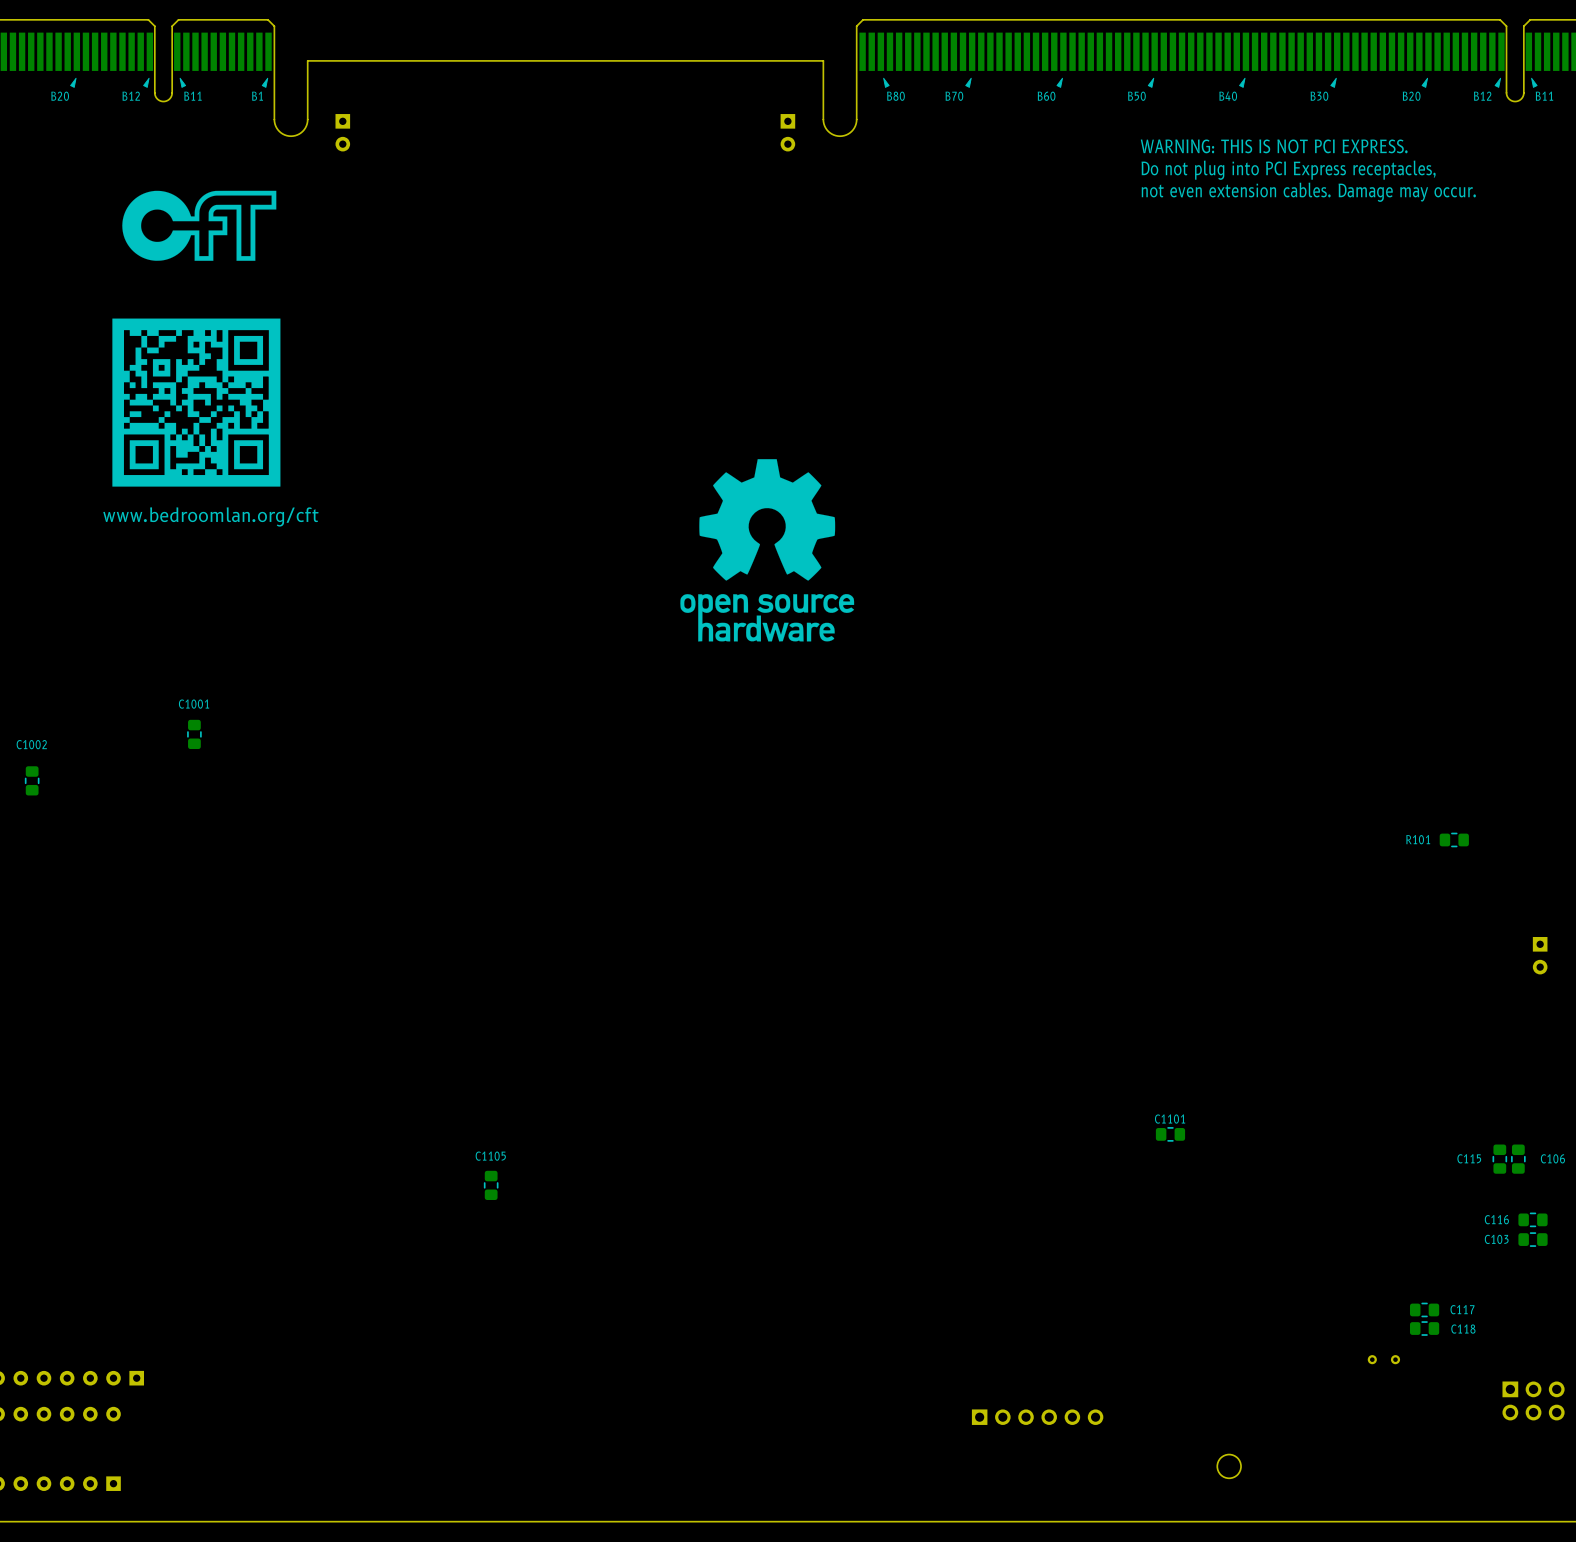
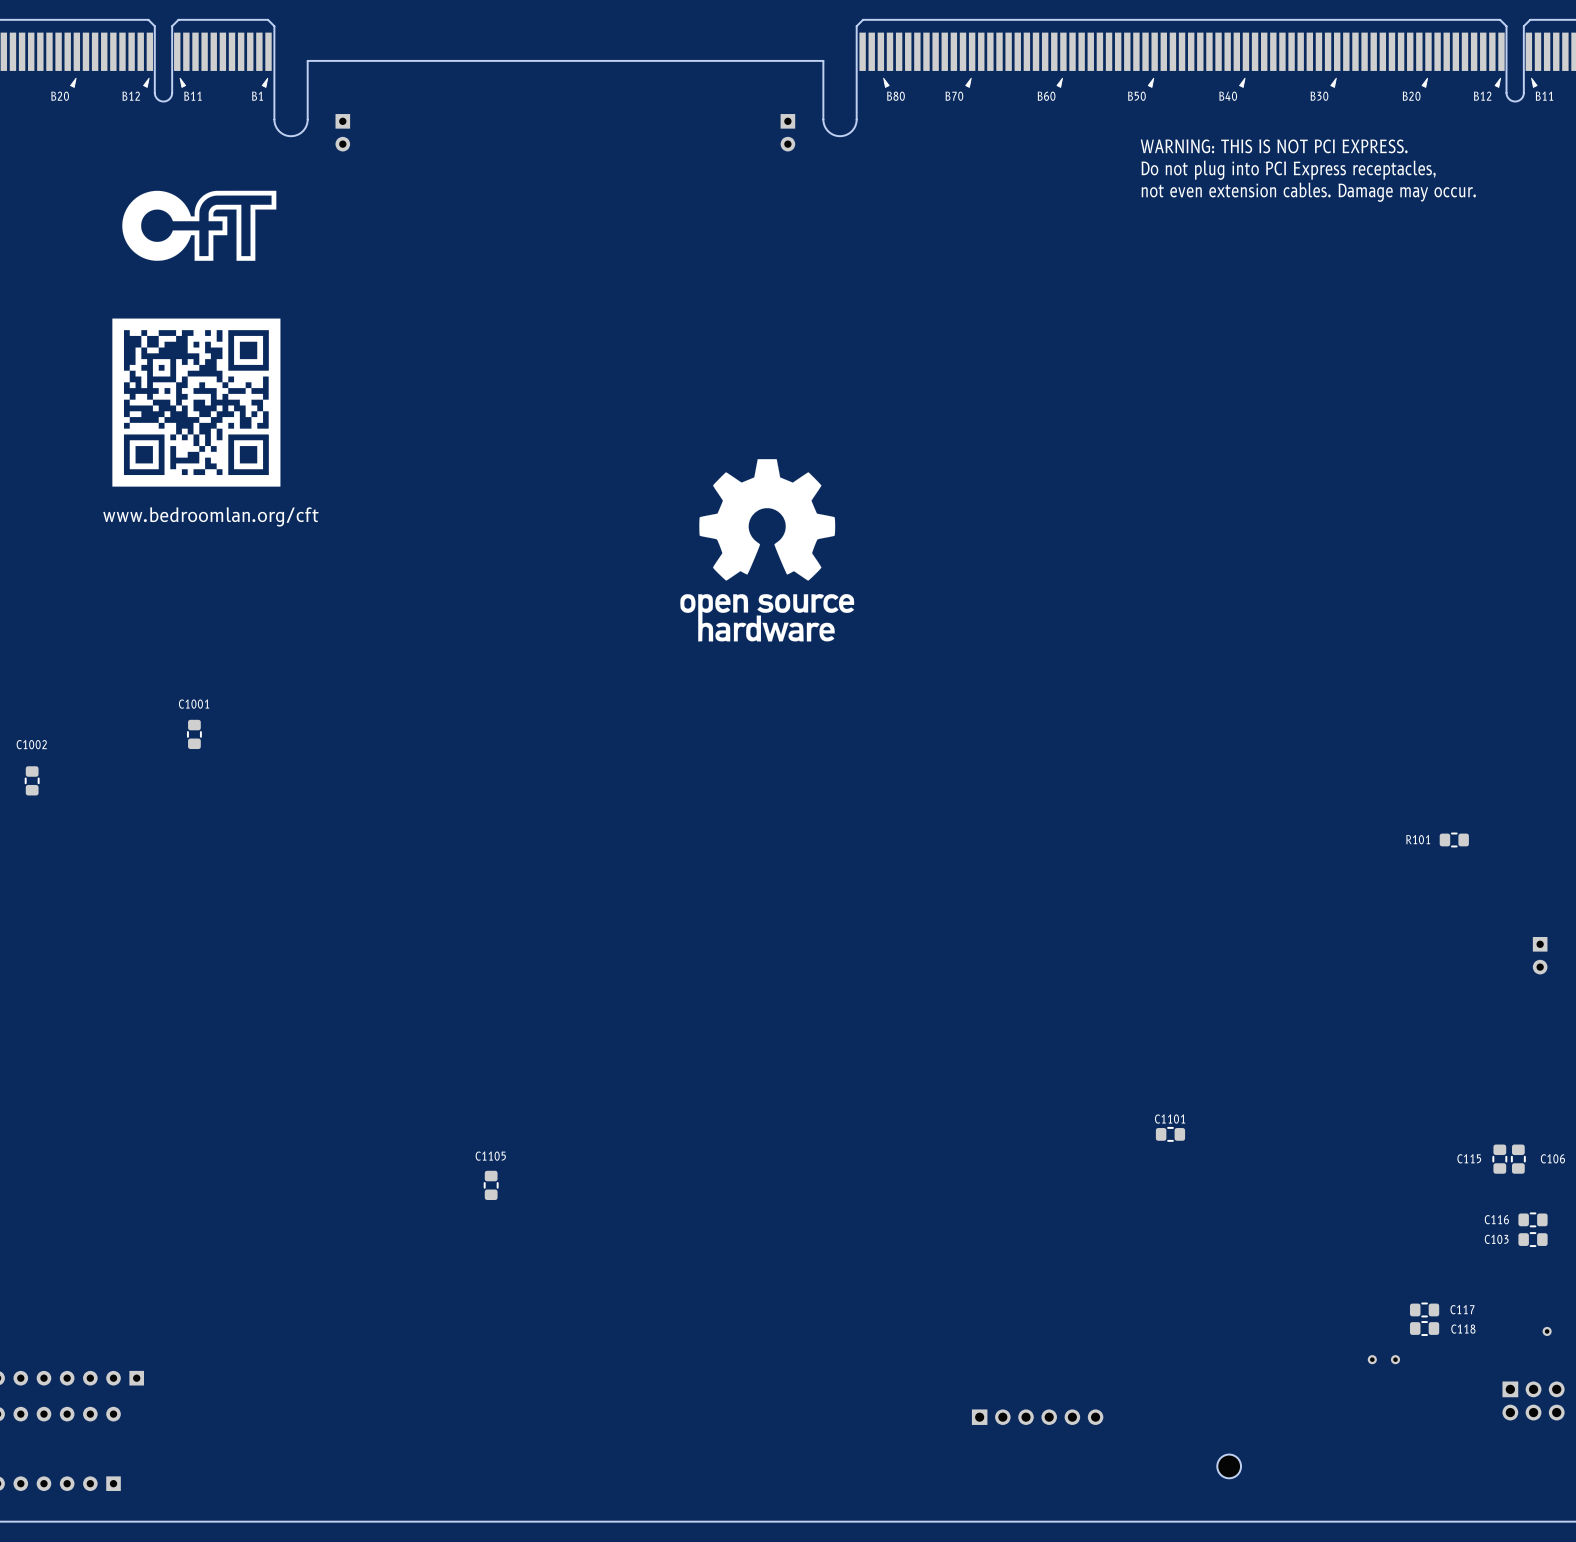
part: none -> (1547, 1331)

